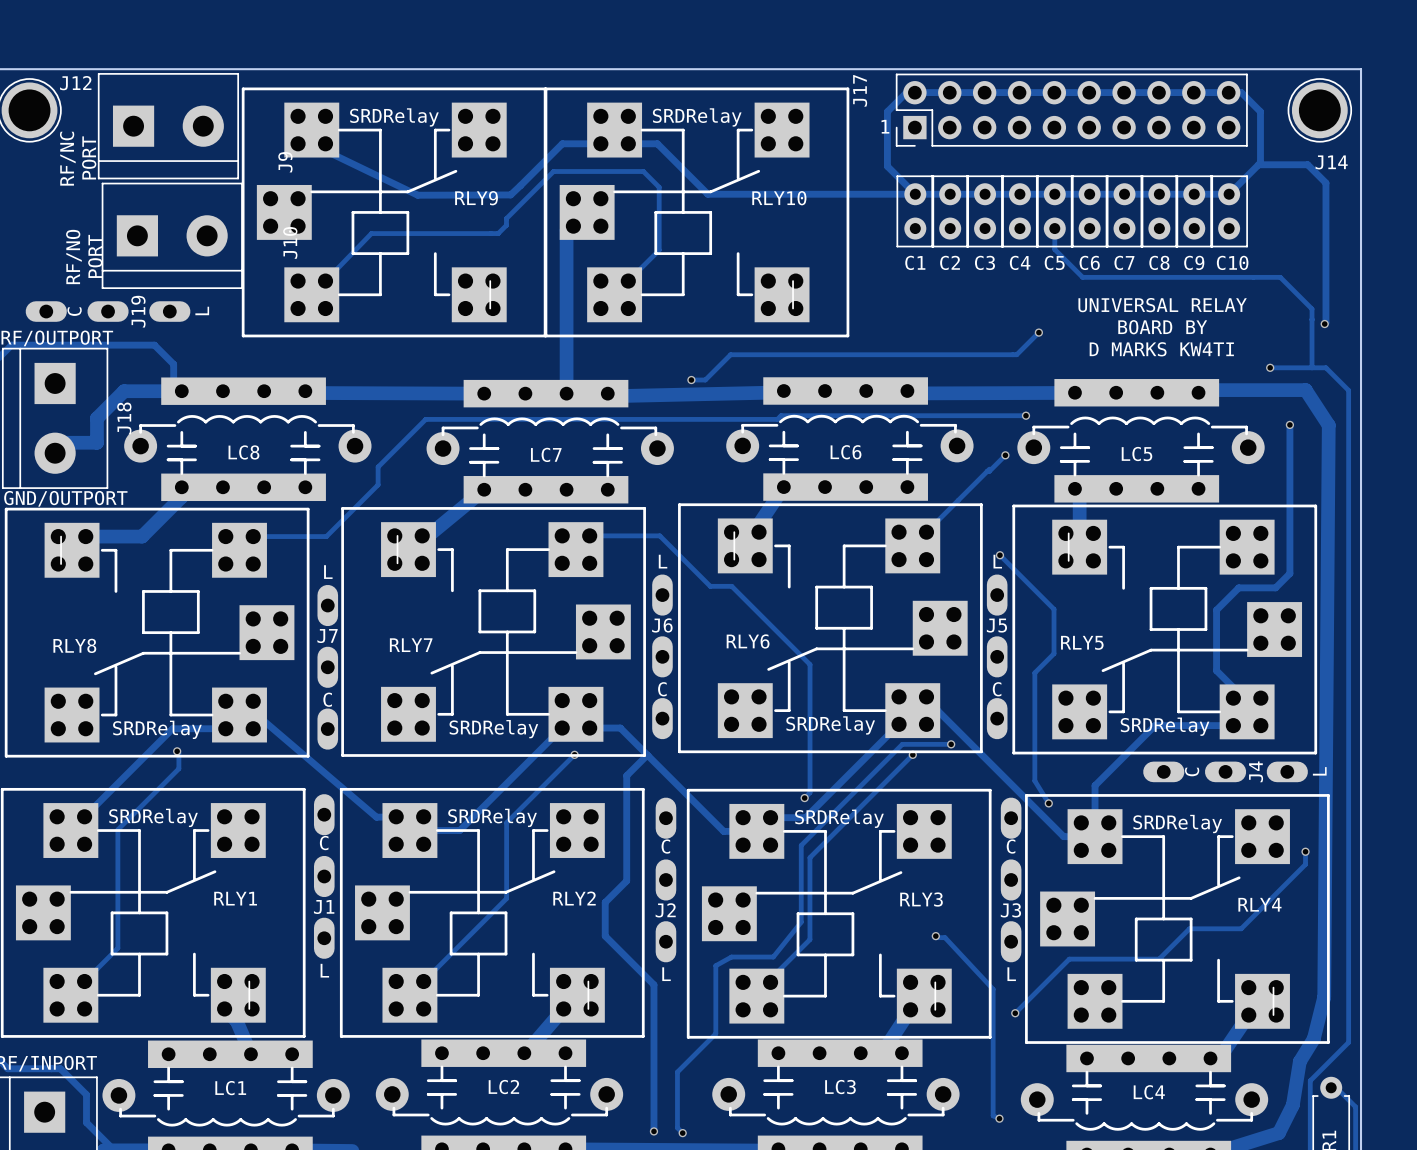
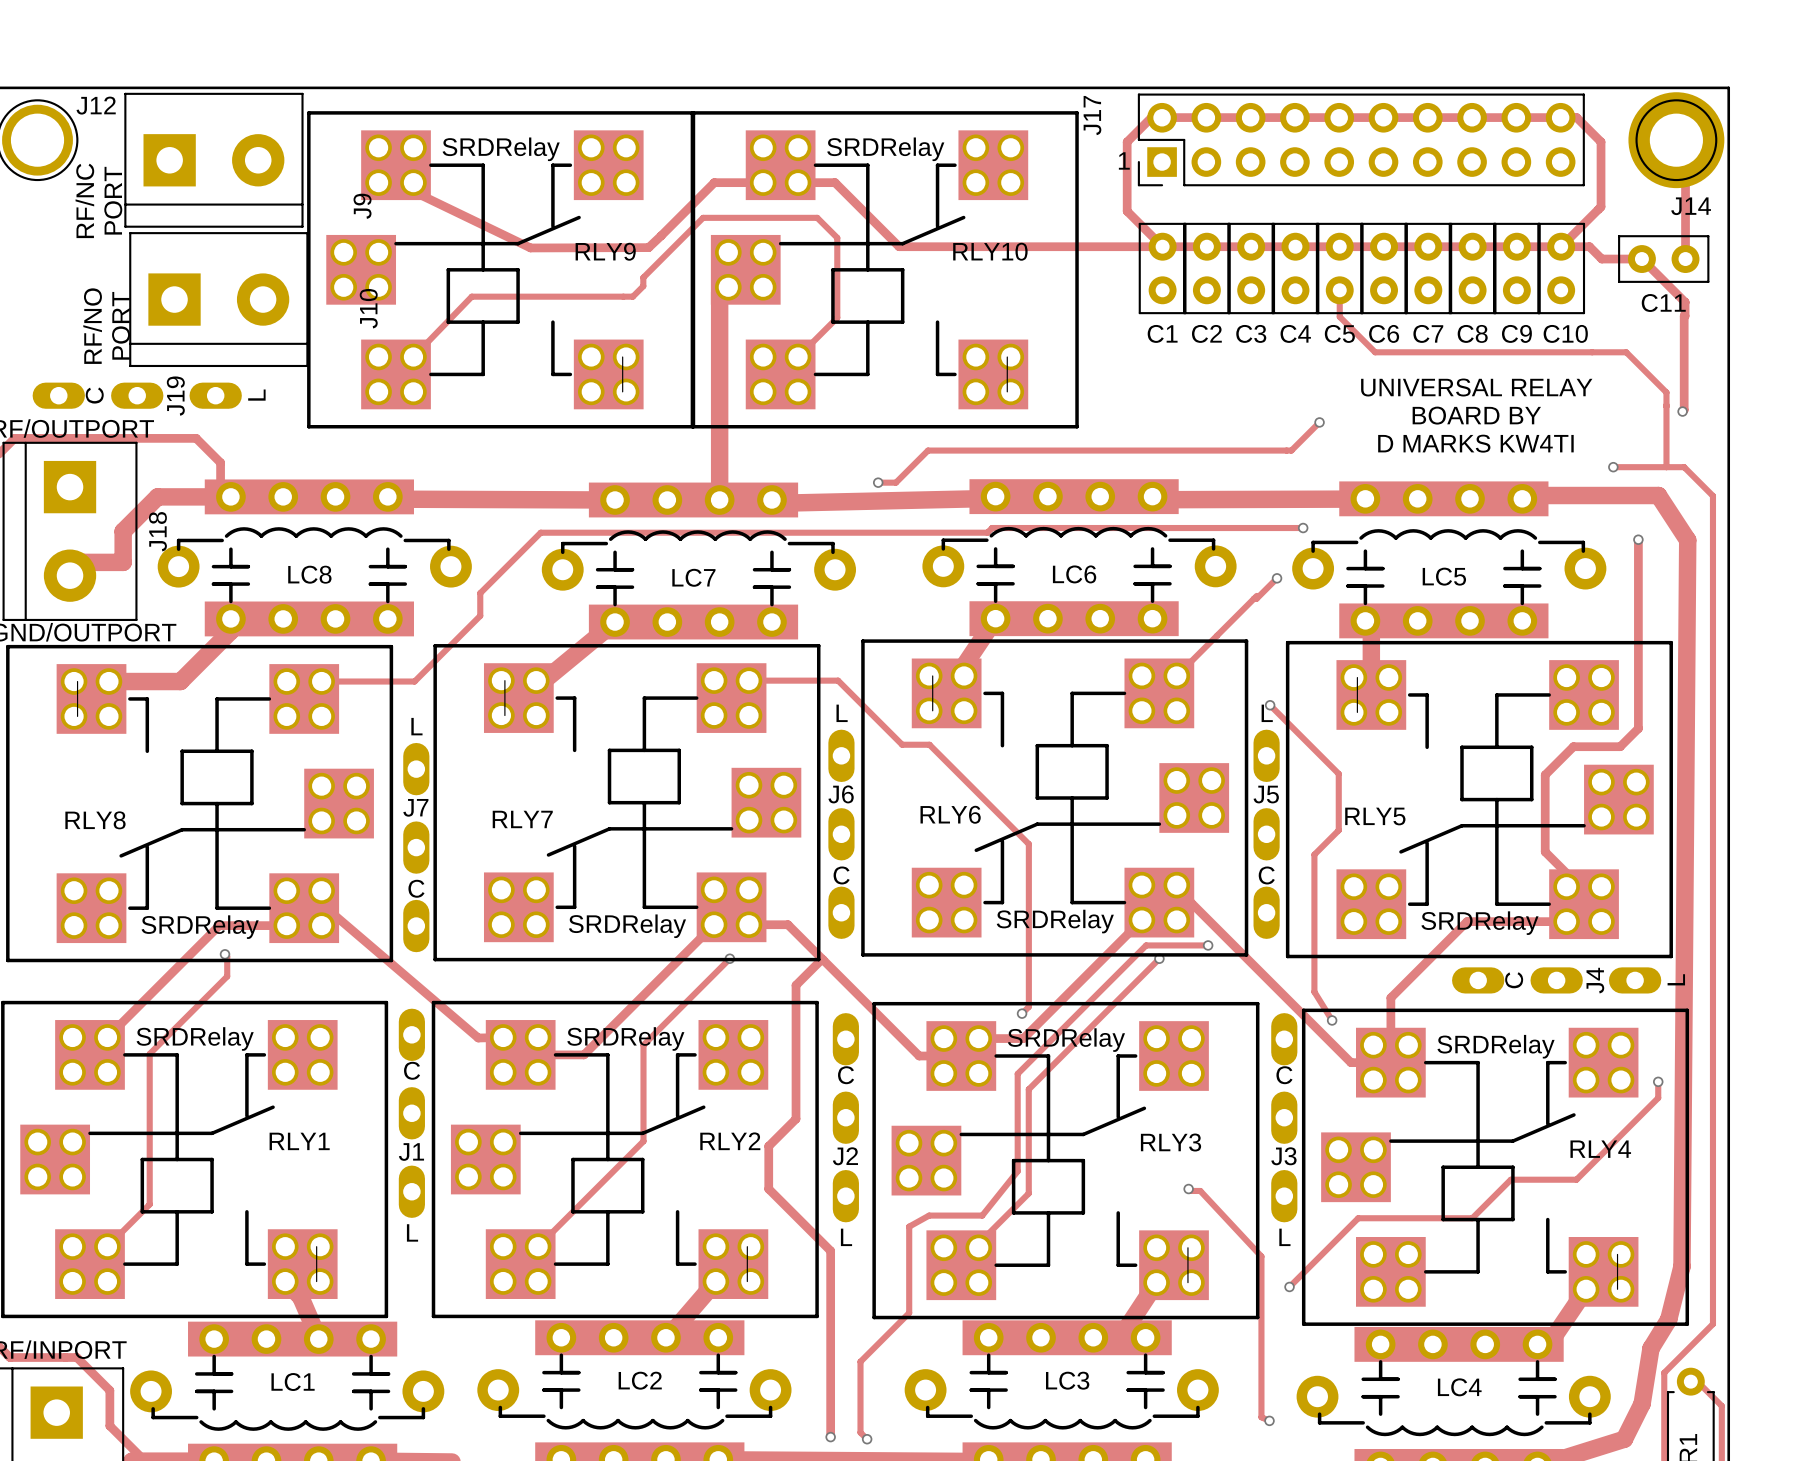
J14 footprint: [1287, 78, 1353, 143] -> [1628, 92, 1725, 189]
track: none -> (1676, 140) (1685, 149) (1685, 259)
track: (1258, 164) (1307, 164) (1325, 183) (1325, 248) -> (1561, 246) (1589, 246) (1601, 259) (1641, 259) (1685, 302) (1684, 316)
C11: none -> (1663, 259)

